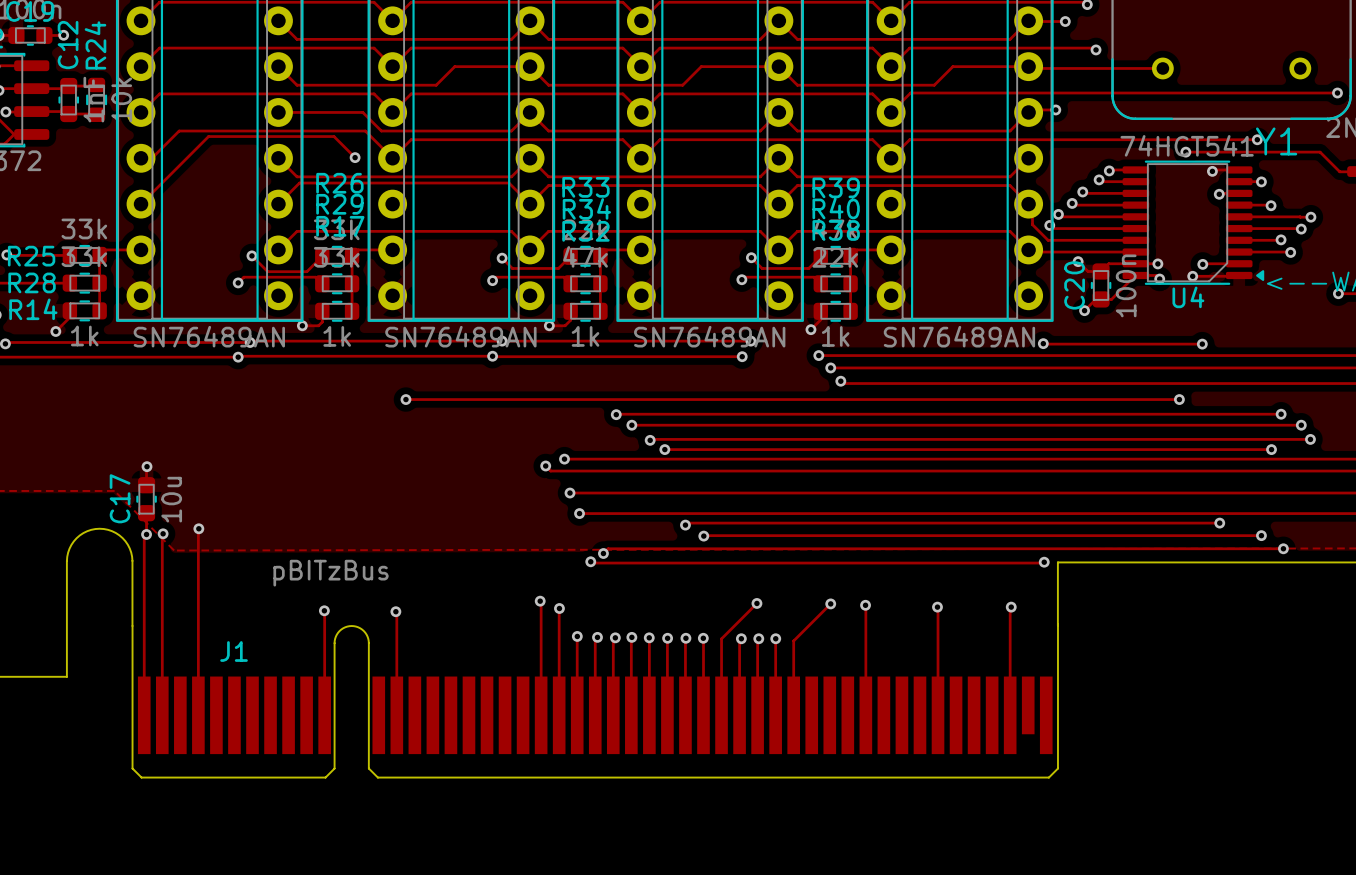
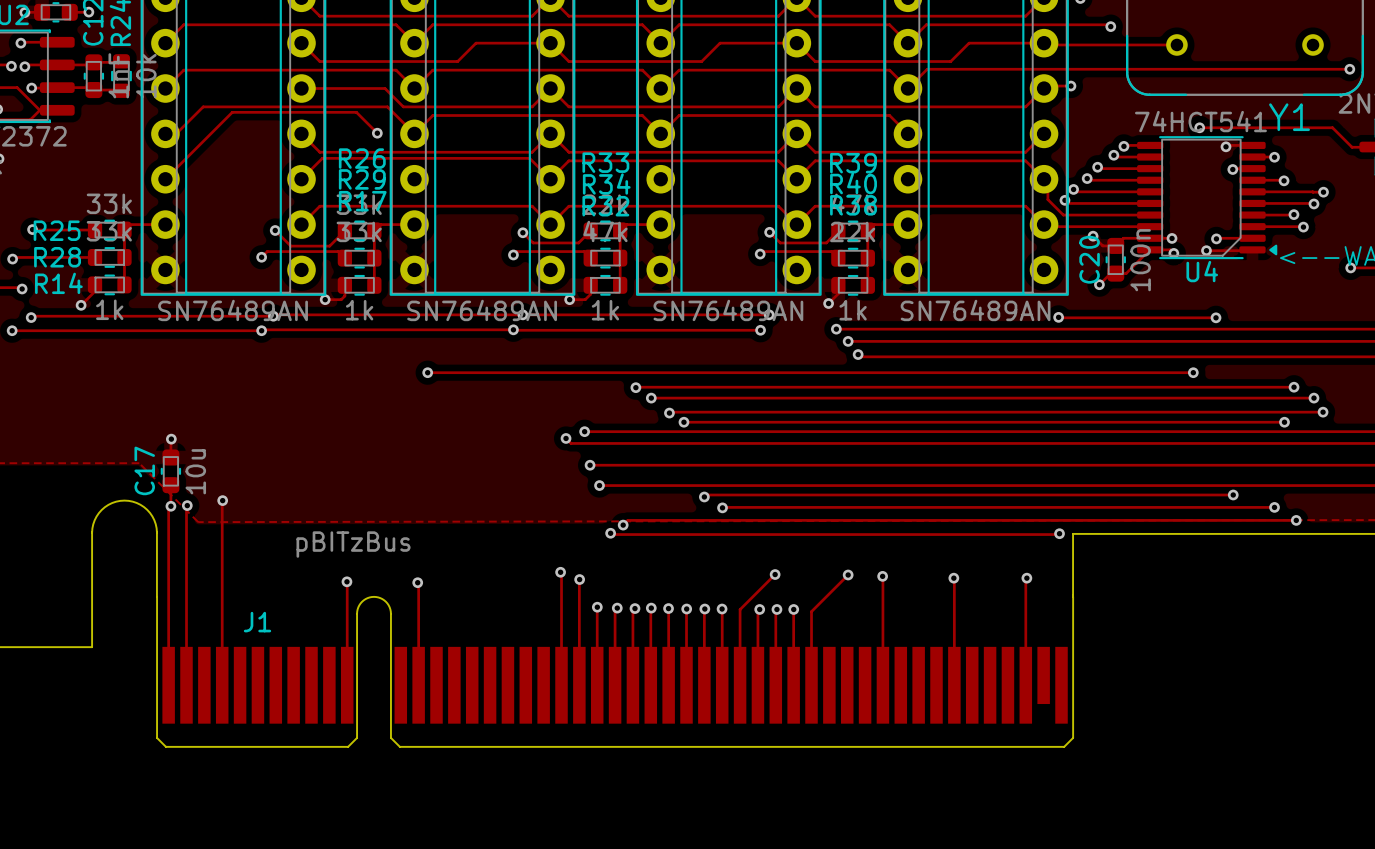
track: (1257, 139) (909, 139) (891, 158) -> none
via: (1257, 139) -> none

